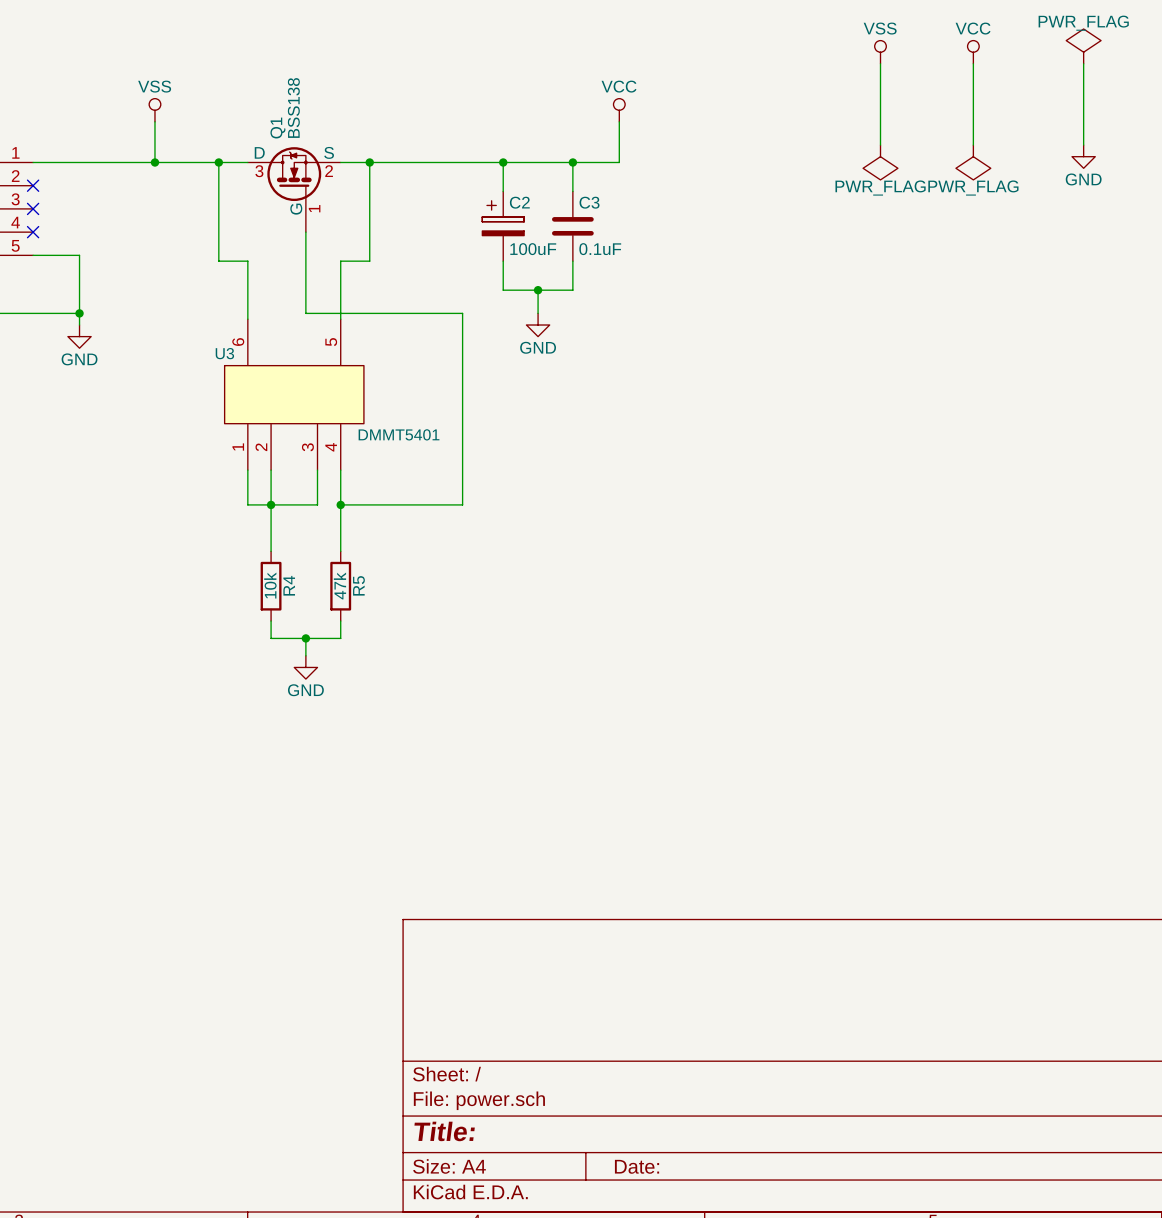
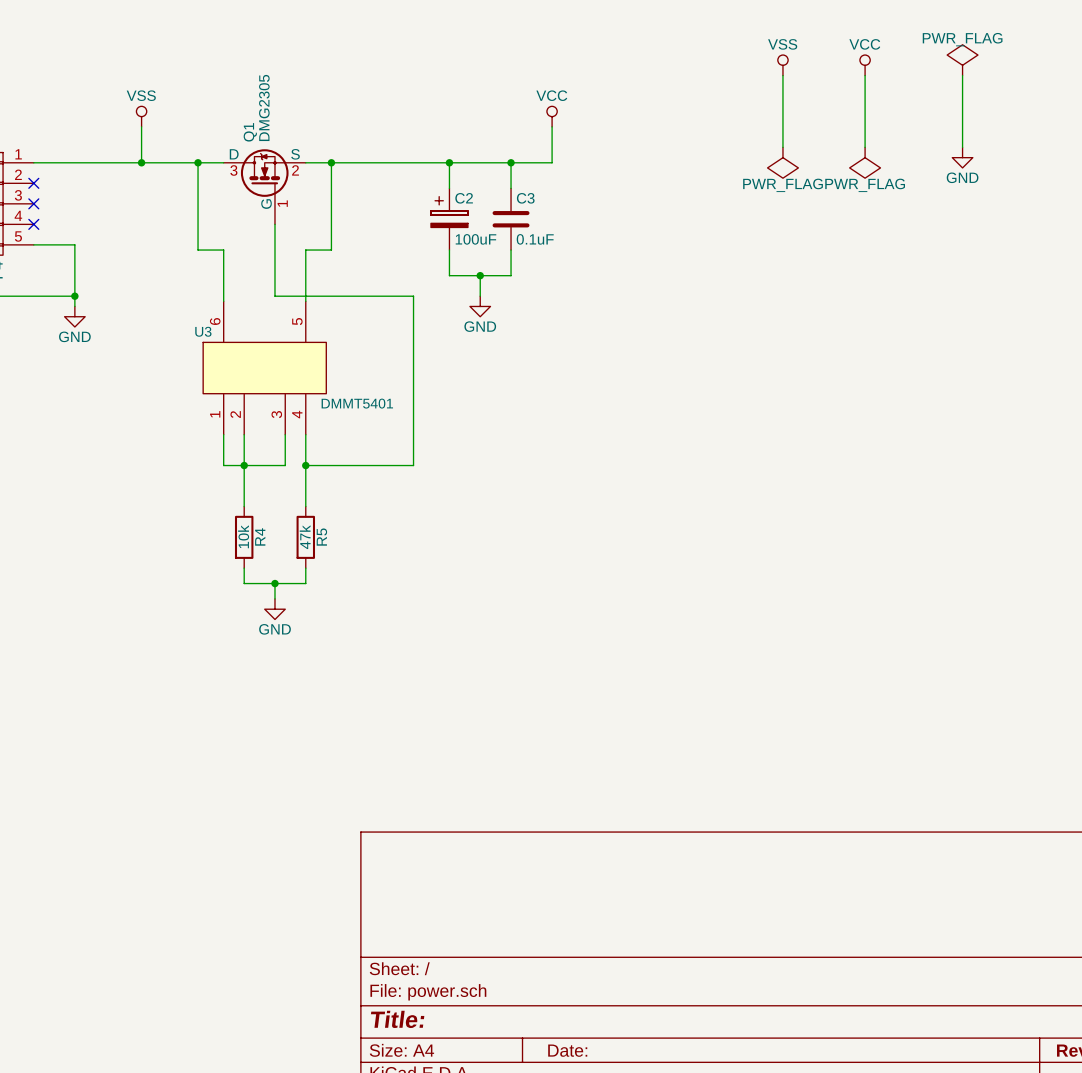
Q1 value: BSS138 (293, 107) -> DMG2305 (264, 107)

